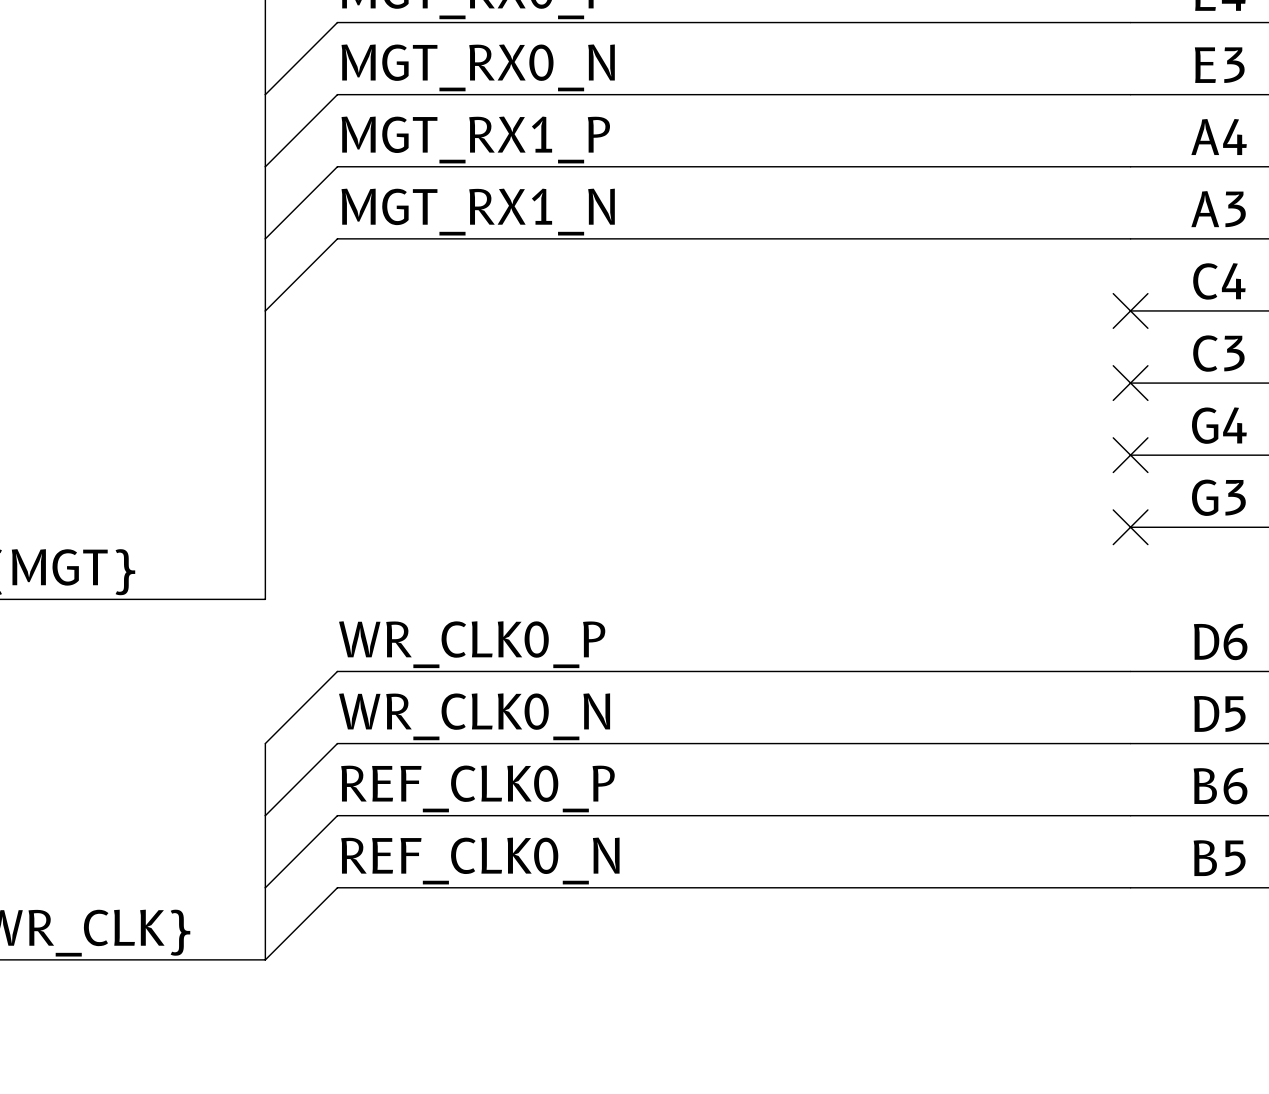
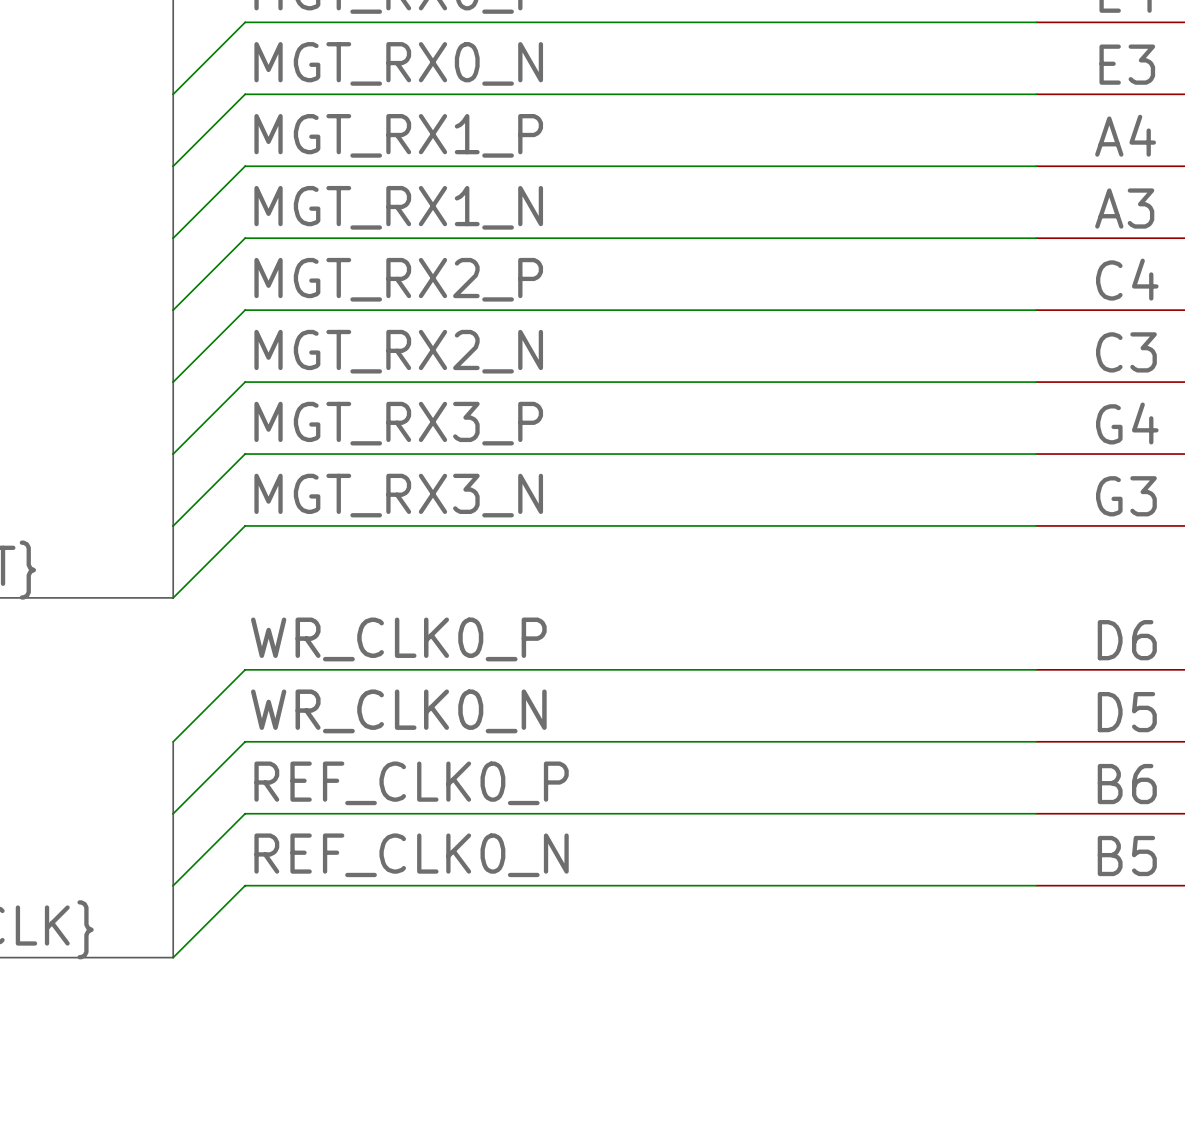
label: none -> MGT_RX2_P (398, 279)
wire: none -> (1036, 310) (245, 310) (173, 382)
no-connect mark: (1130, 310) -> none
label: none -> MGT_RX2_N (398, 351)
wire: none -> (1036, 382) (245, 382) (173, 454)
no-connect mark: (1130, 383) -> none
label: none -> MGT_RX3_P (398, 423)
wire: none -> (1036, 454) (245, 454) (173, 525)
no-connect mark: (1130, 455) -> none
label: none -> MGT_RX3_N (398, 495)
wire: none -> (1036, 525) (245, 525) (173, 597)
no-connect mark: (1130, 527) -> none

